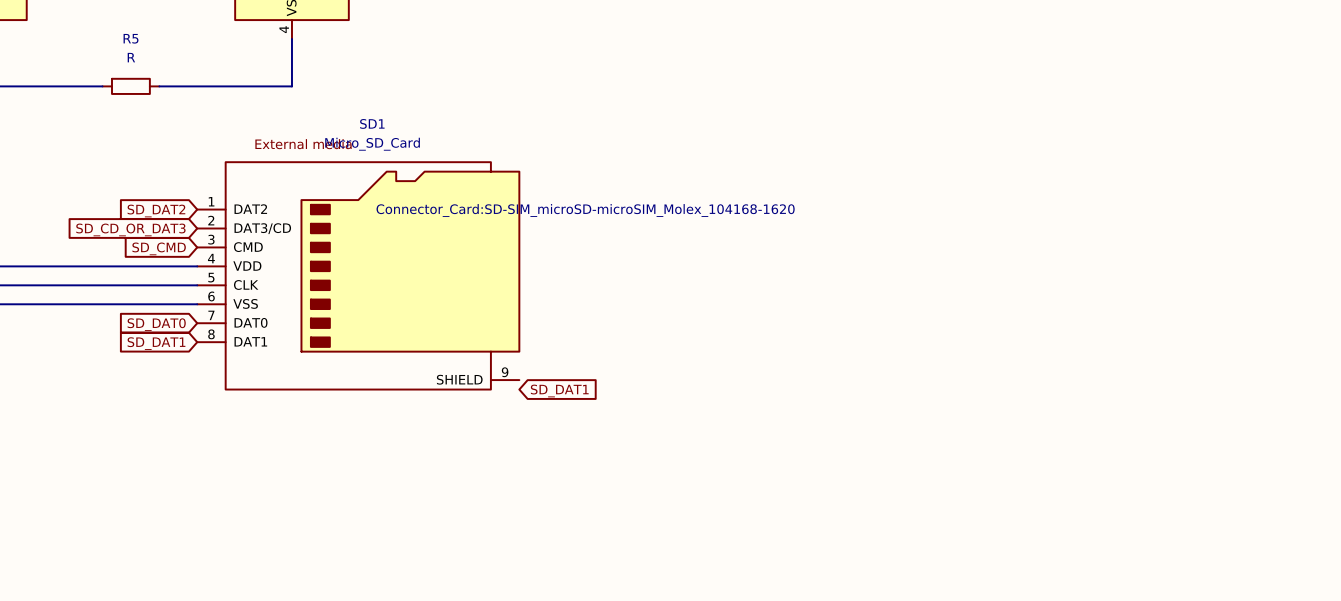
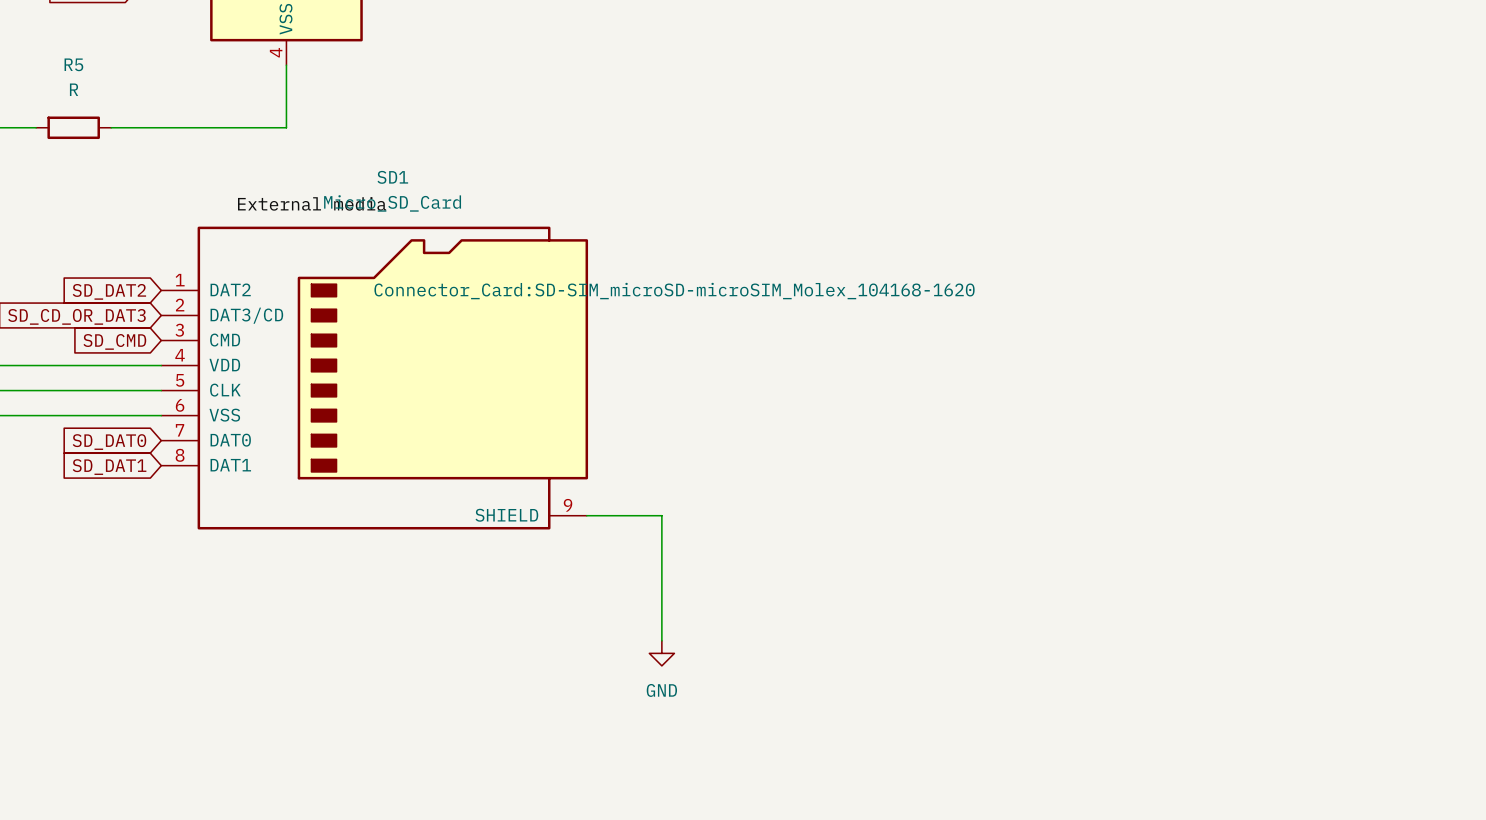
wire: none -> (586, 515) (661, 515) (661, 640)
global label: SD_DAT1 (559, 390) -> none
power symbol: none -> GND (661, 653)

